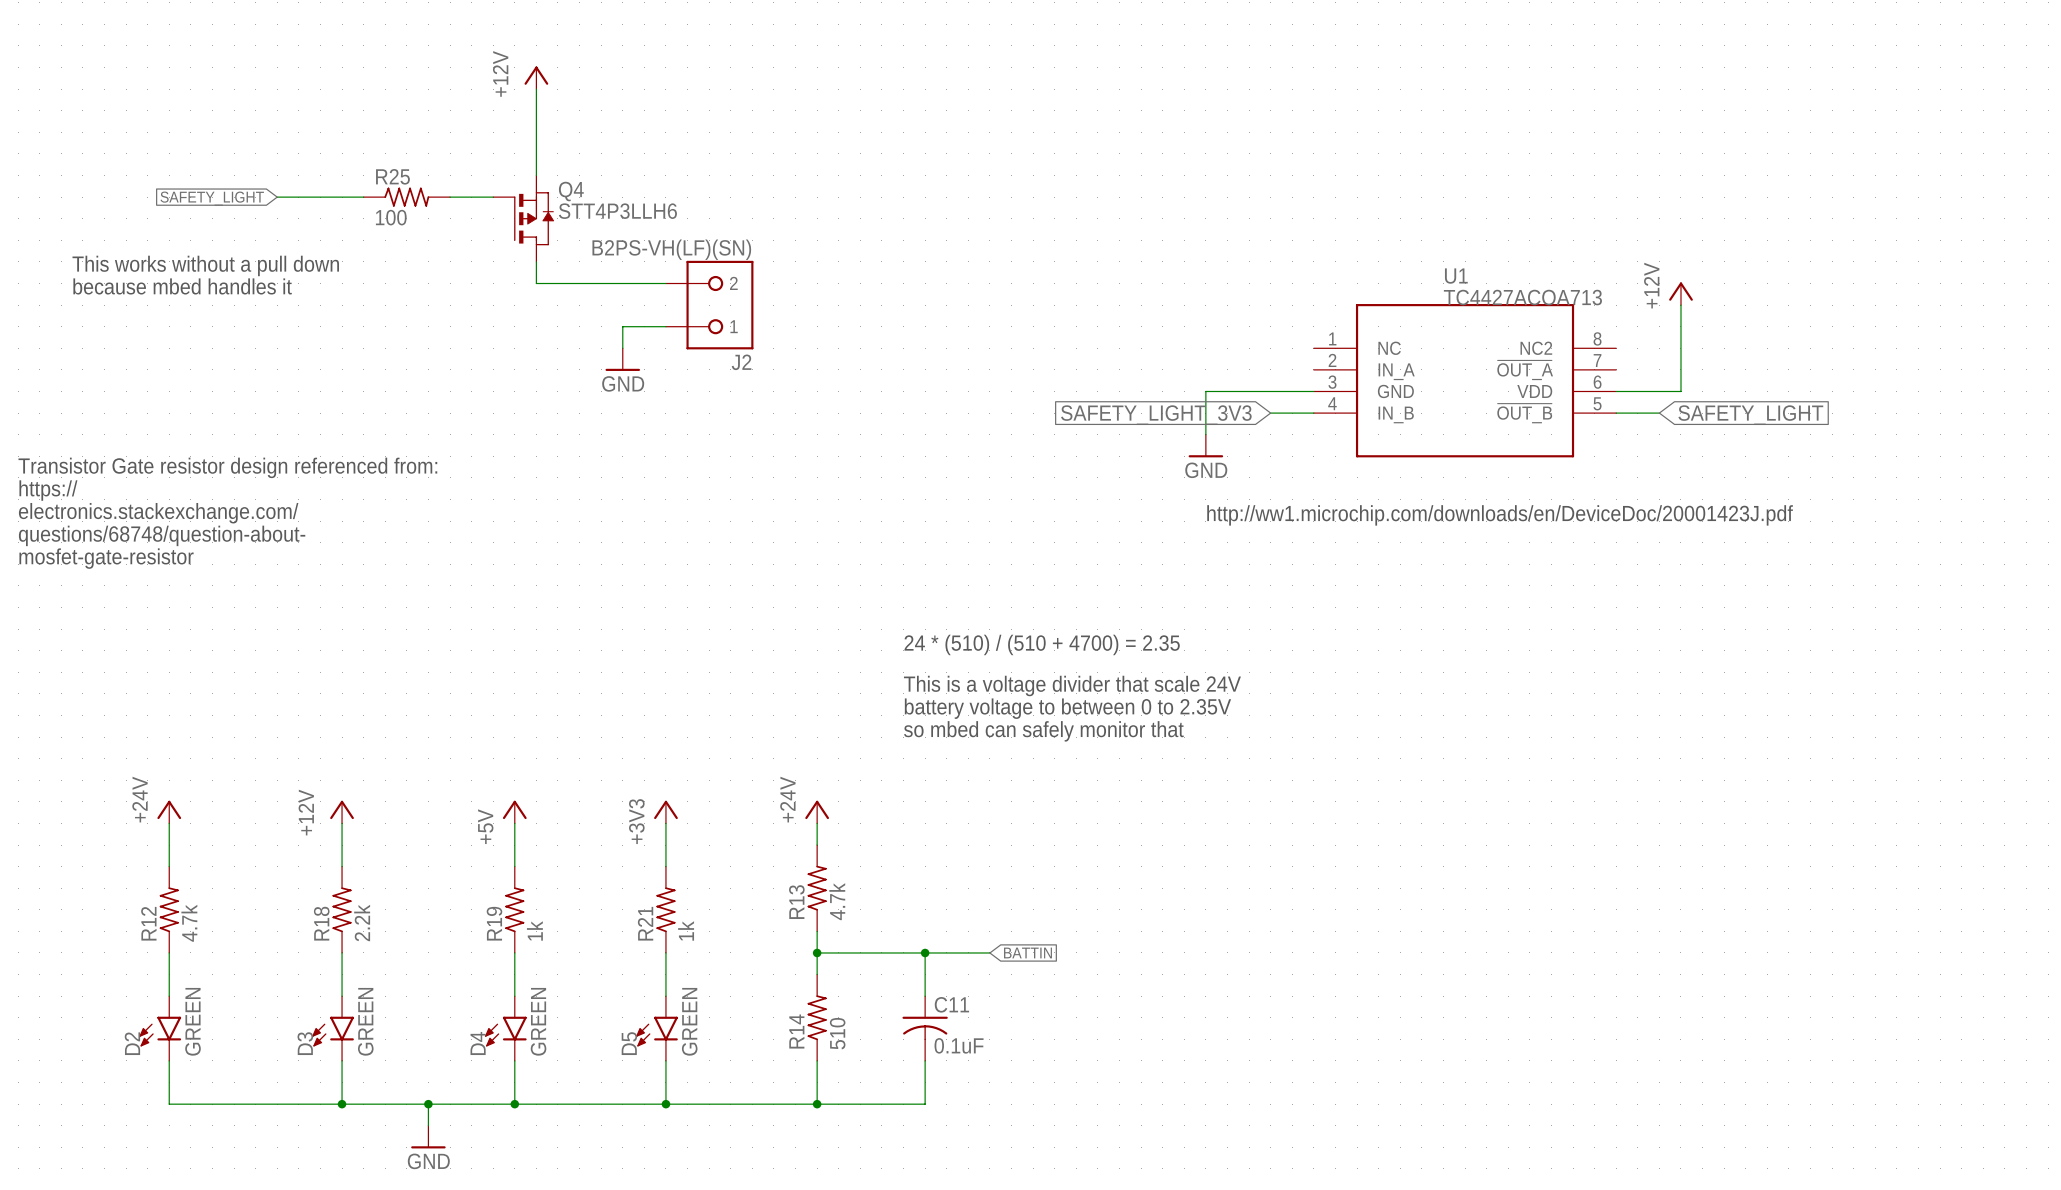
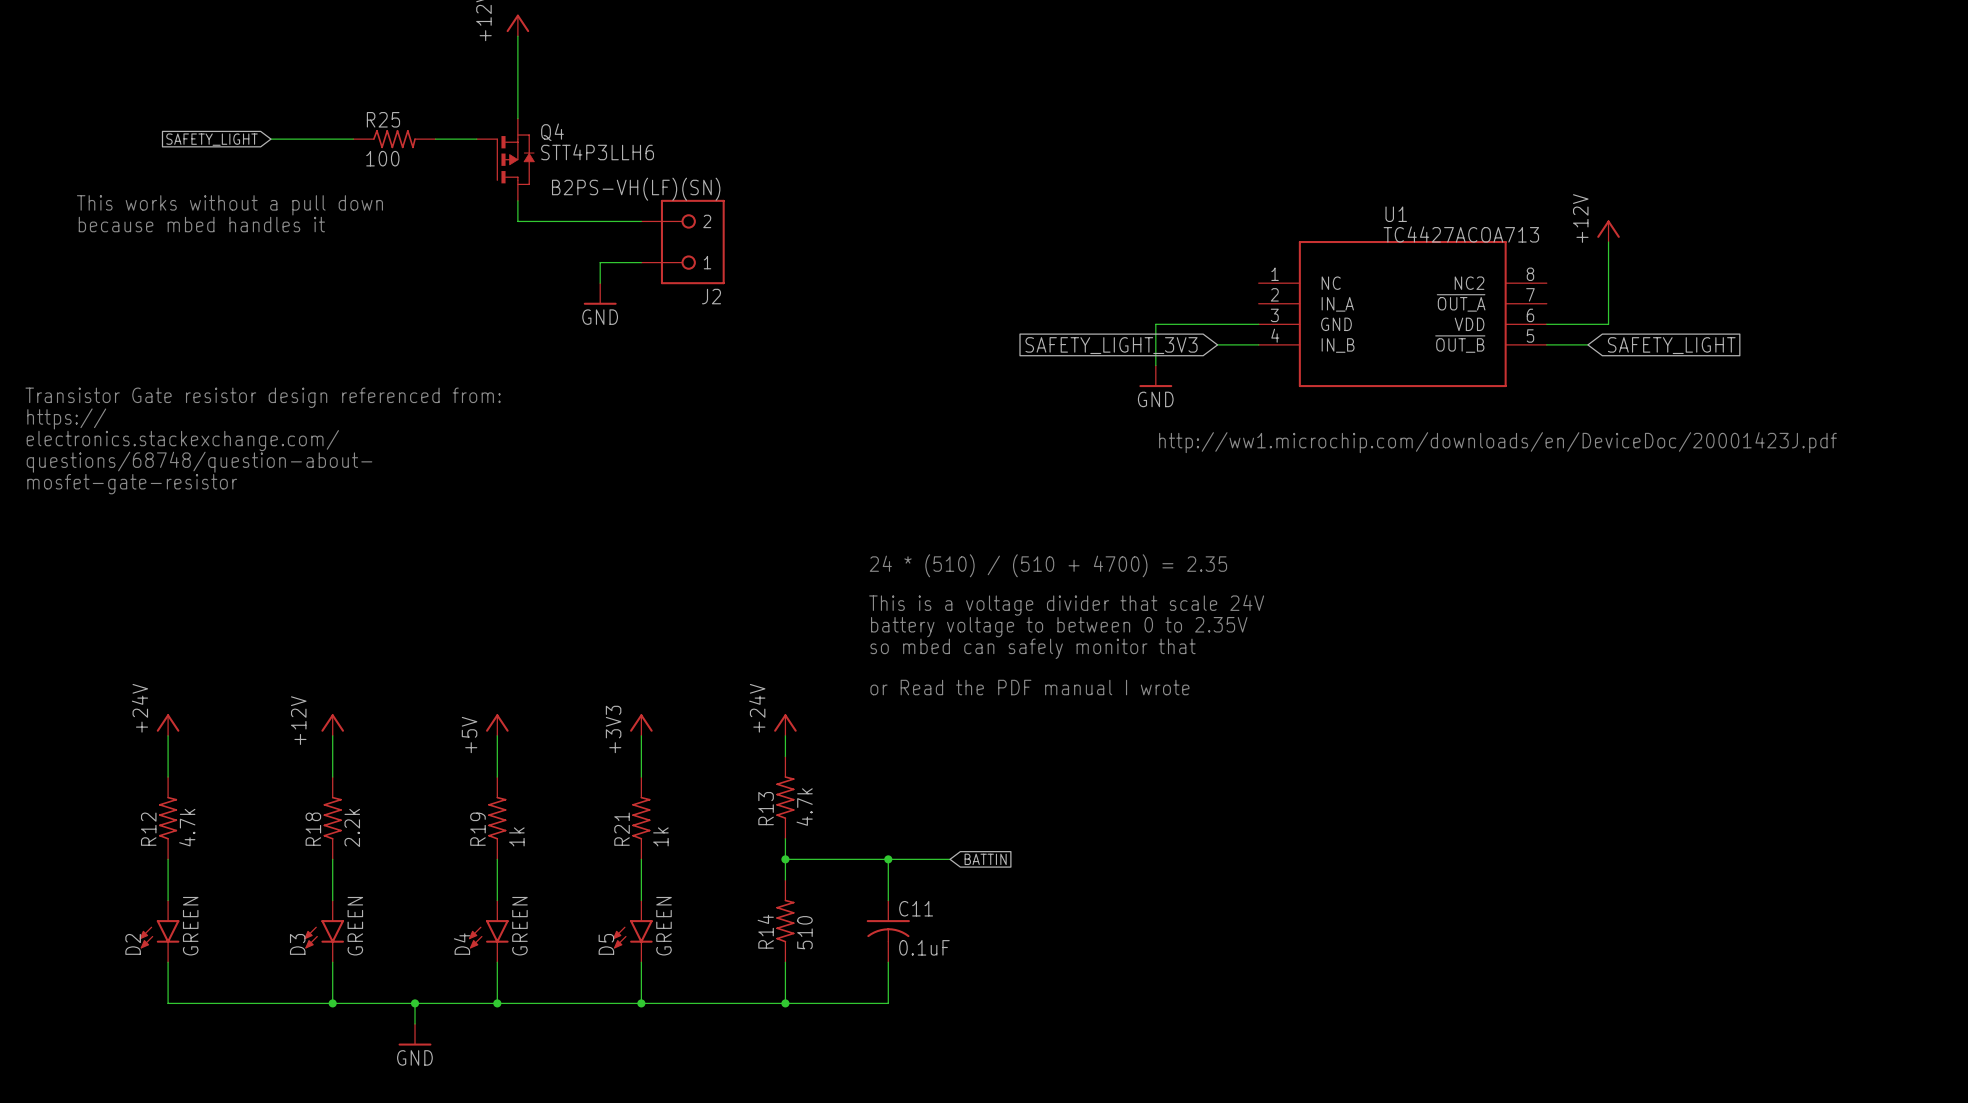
text: none -> or Read the PDF manual I wrote (1029, 687)

